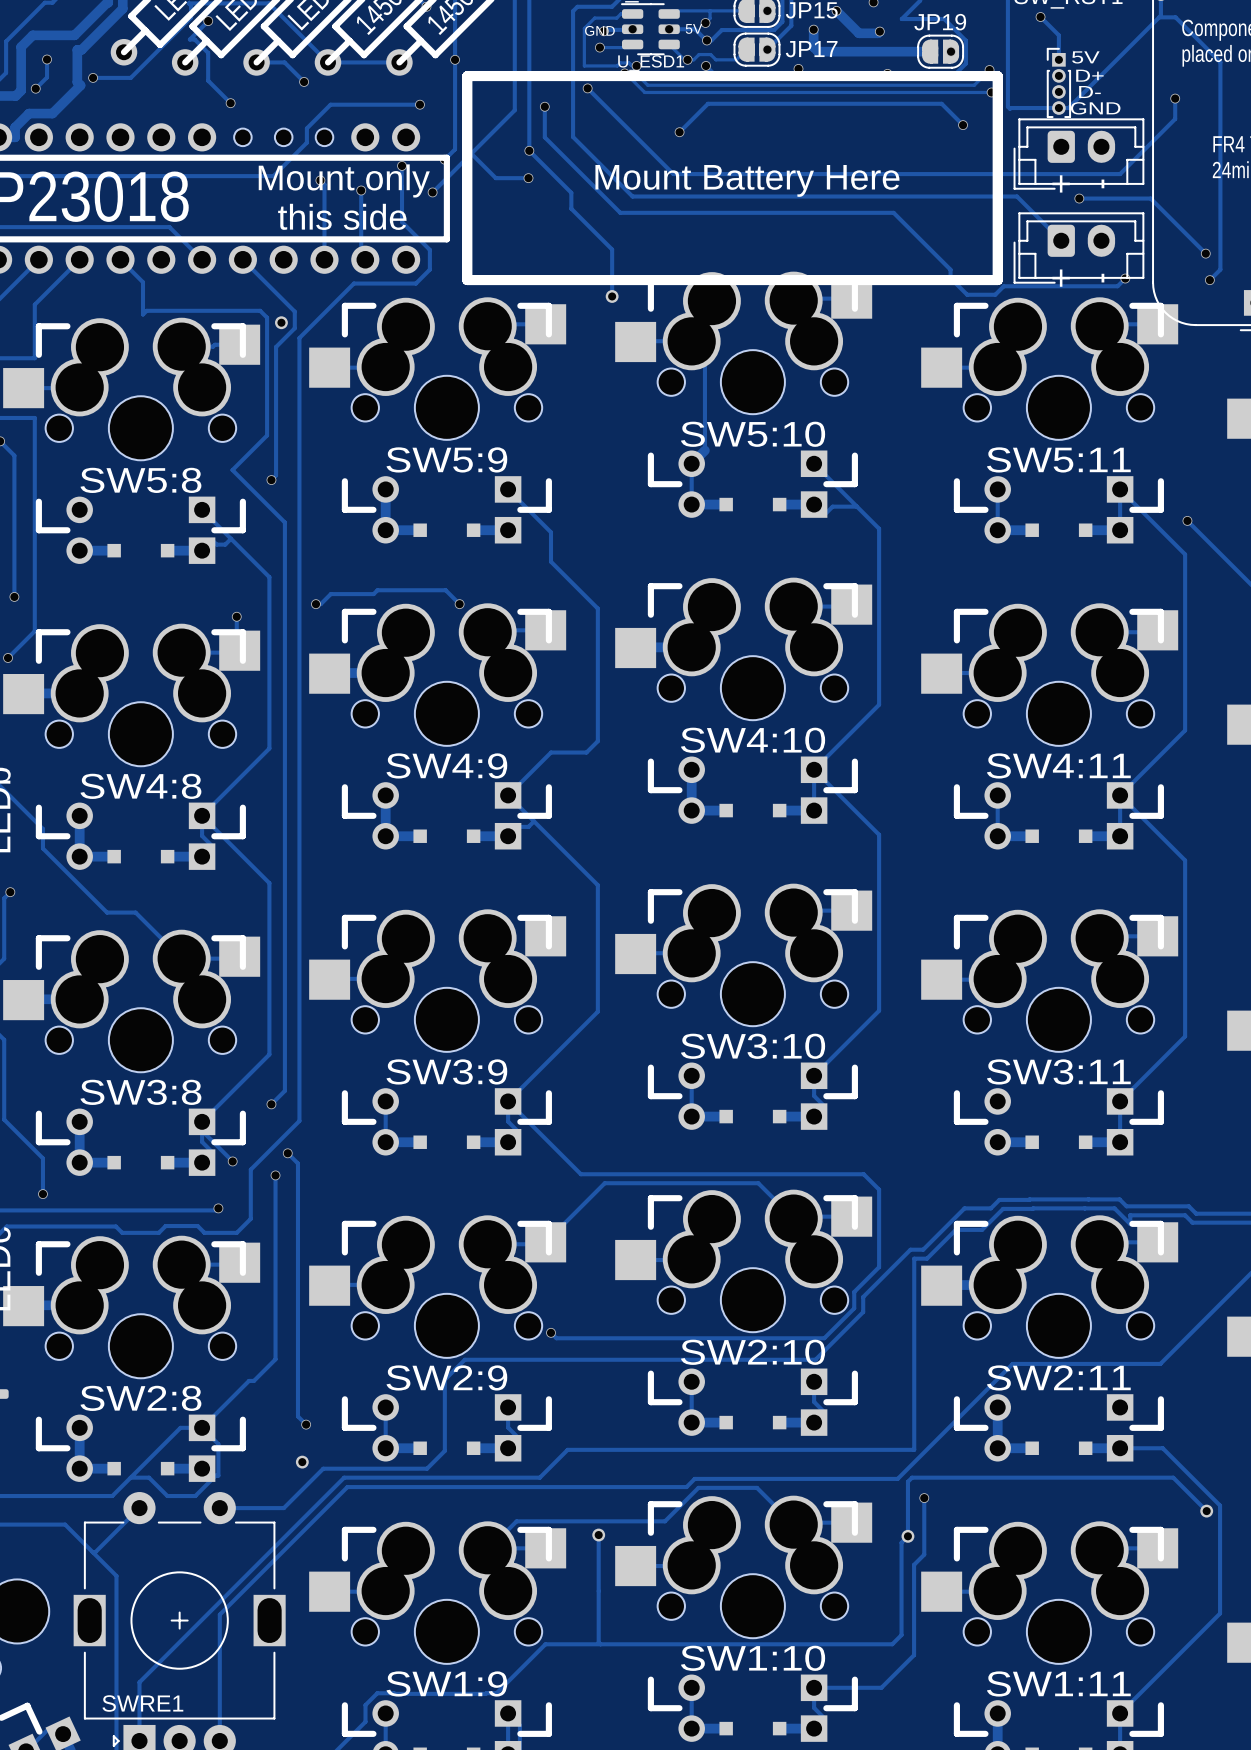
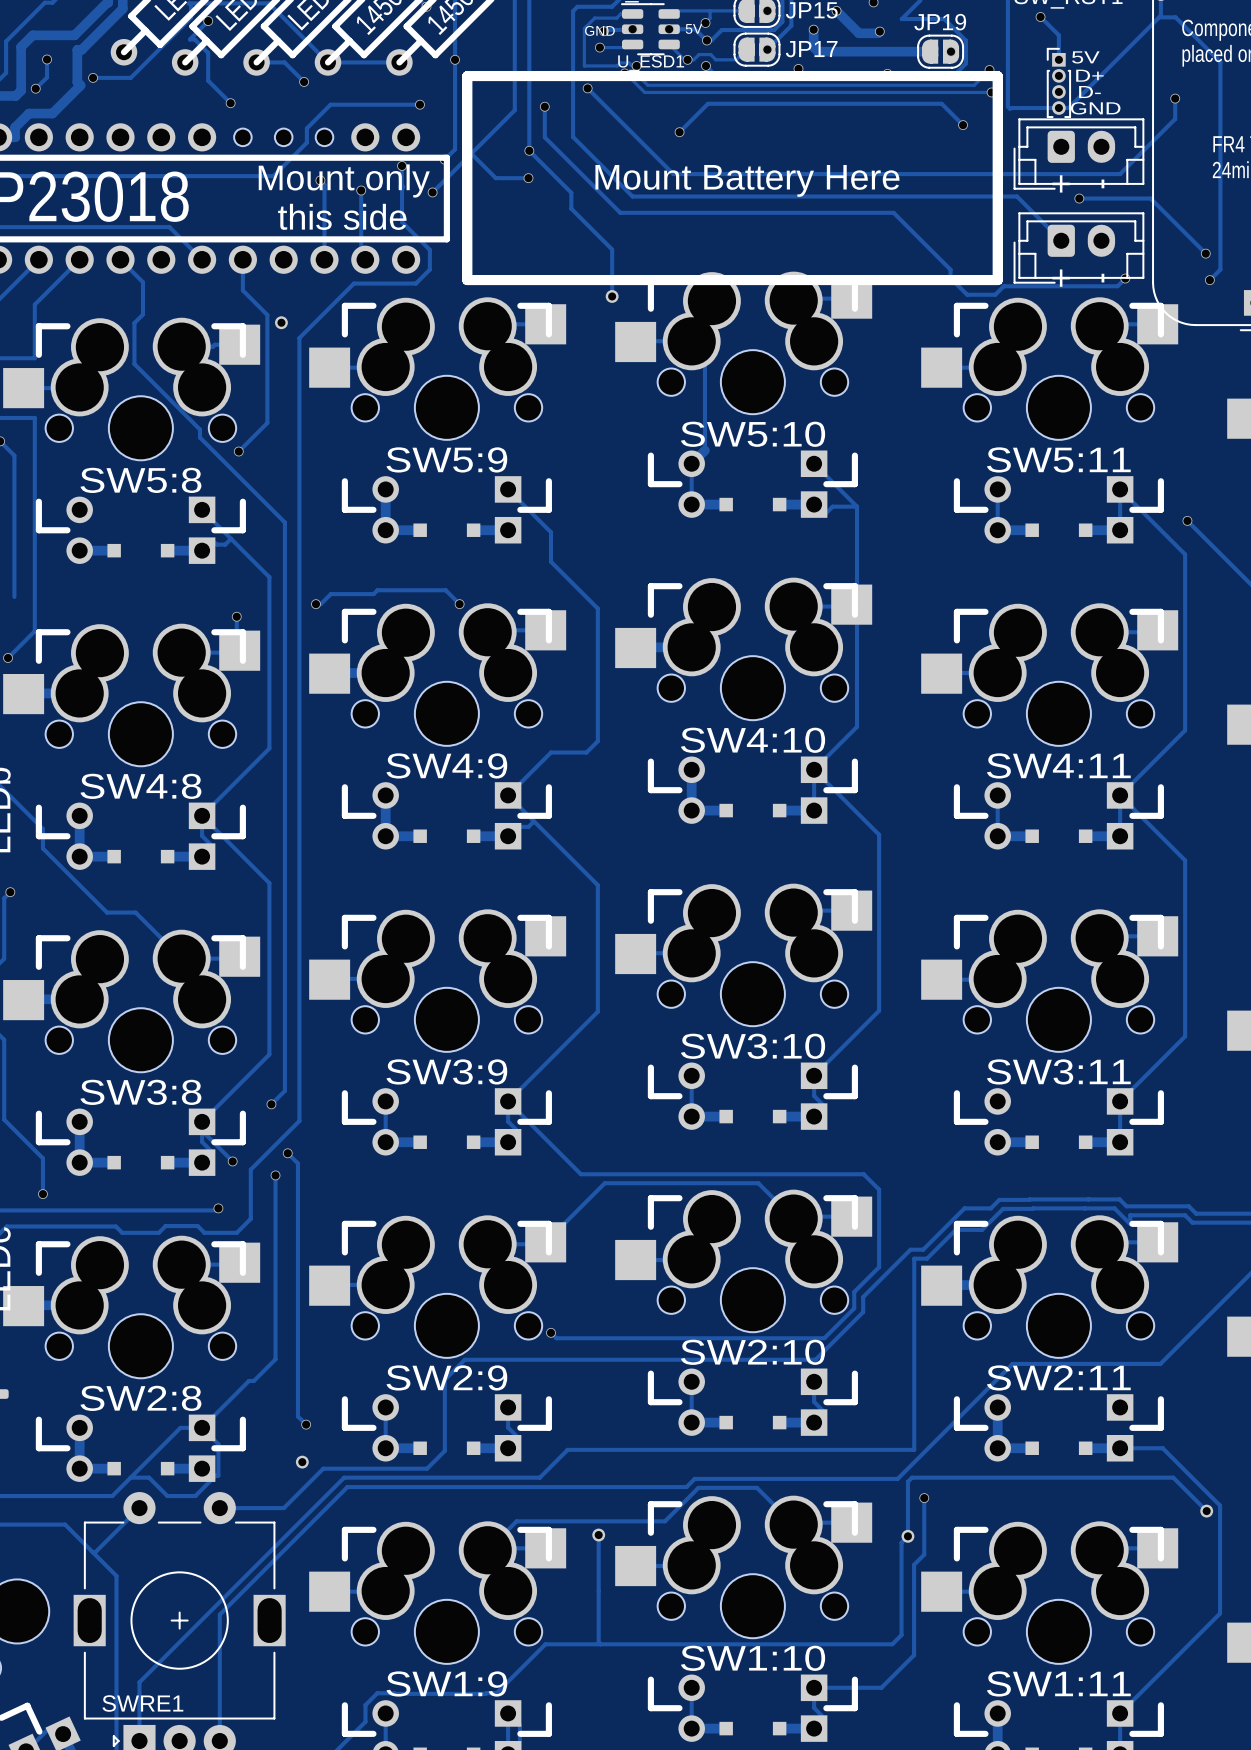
track: (242, 259) (294, 311) (294, 328) (276, 347) (276, 475) (271, 480) -> (242, 259) (242, 290) (267, 314) (267, 422) (238, 451)
track: (143, 314) (146, 310) (260, 310) (267, 317) (267, 435) (232, 470) -> (143, 314) (134, 323) (134, 364) (199, 429) (199, 437) (232, 470)
via position: (271, 480) -> (238, 451)
track: (857, 506) (879, 528) (879, 704) (857, 726) -> (857, 506) (857, 726)
via: (14, 596) -> none

